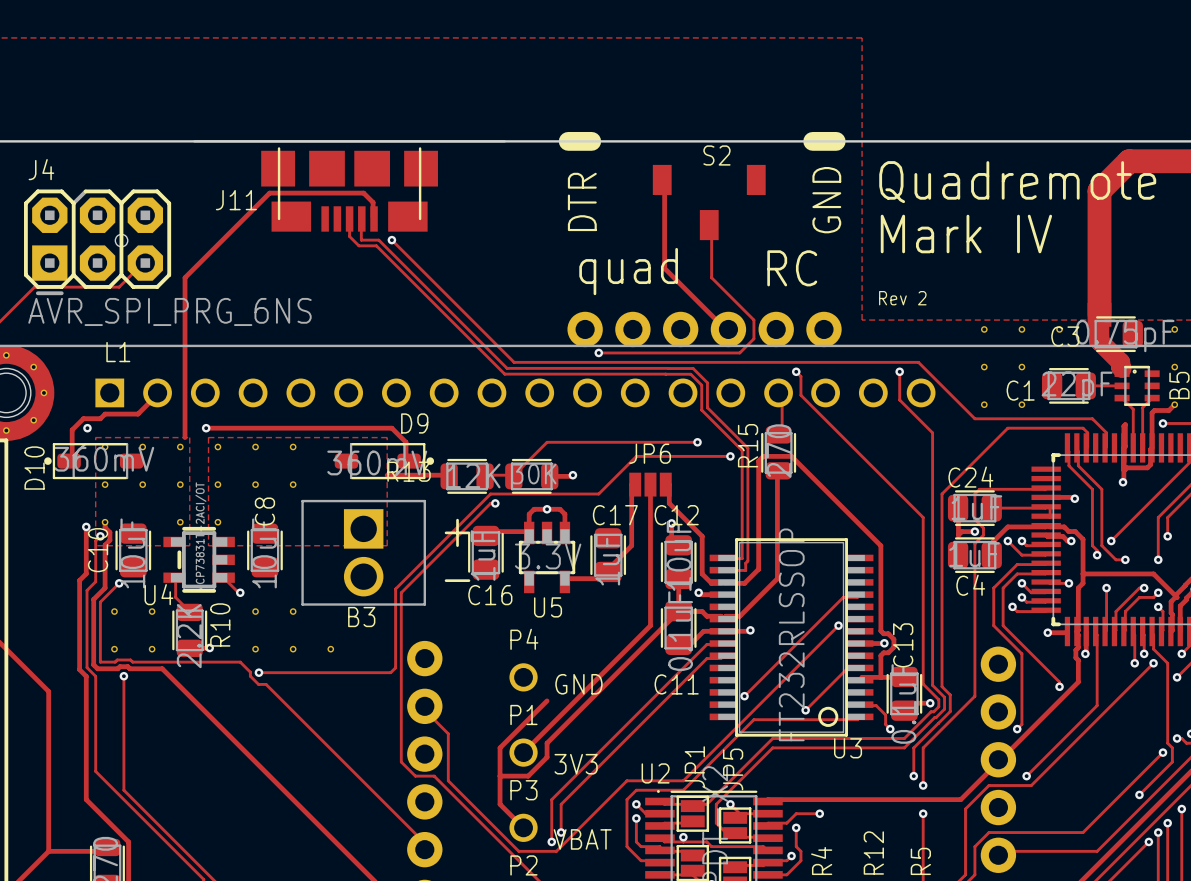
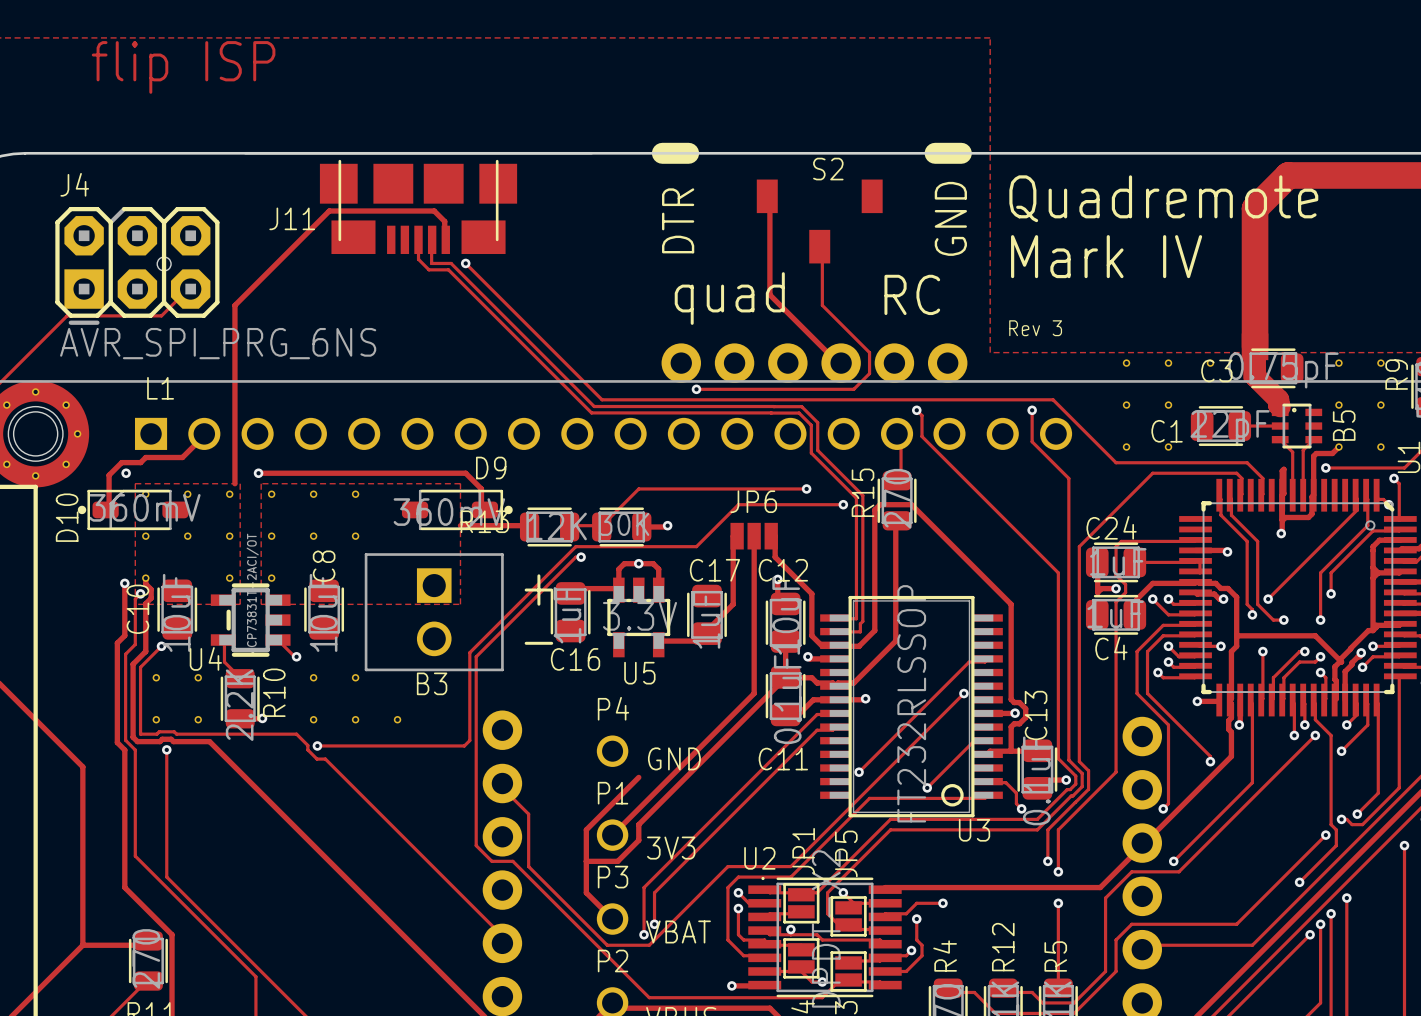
text: none -> flip ISP (183, 67)
text: Rev 2 (902, 298) -> Rev 3 (1035, 328)
B3 footprint: [301, 499, 427, 606] -> [364, 553, 504, 672]

